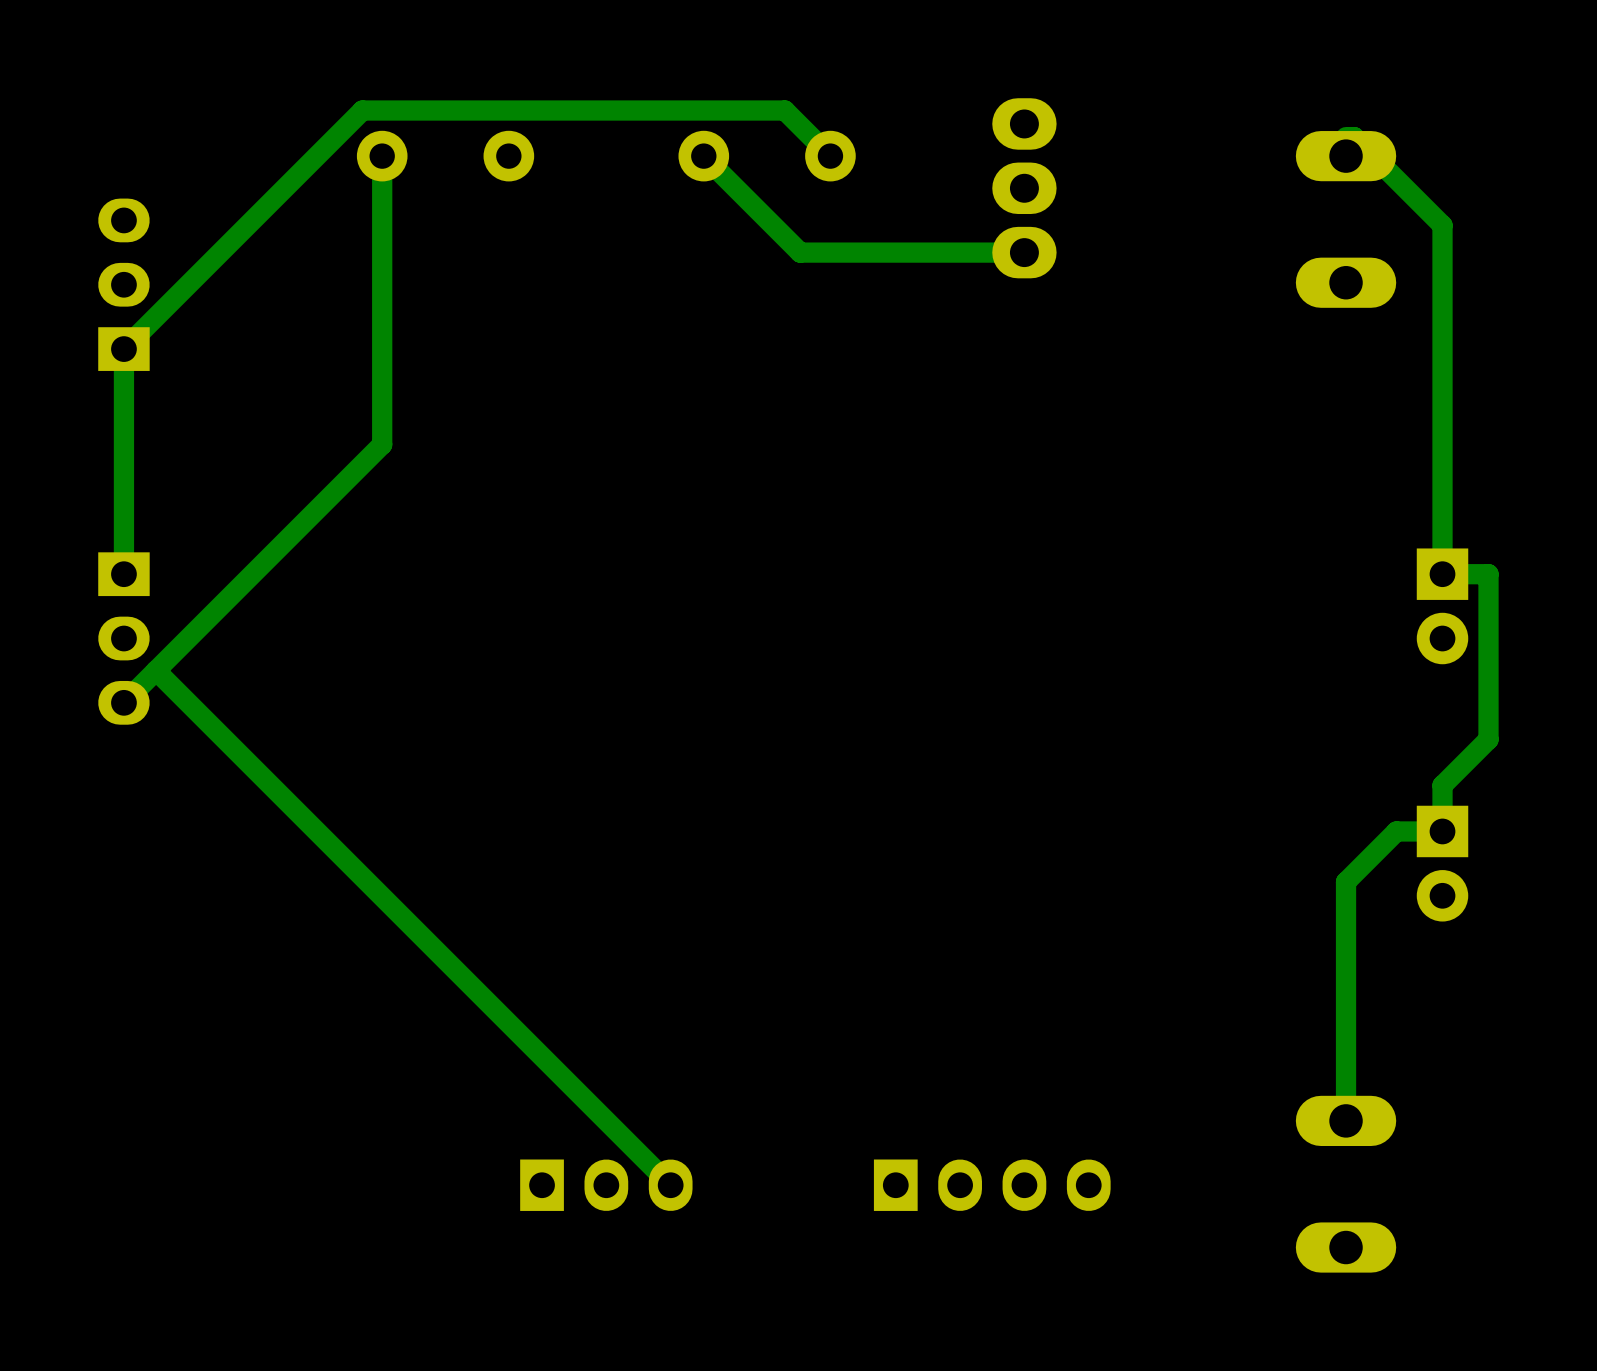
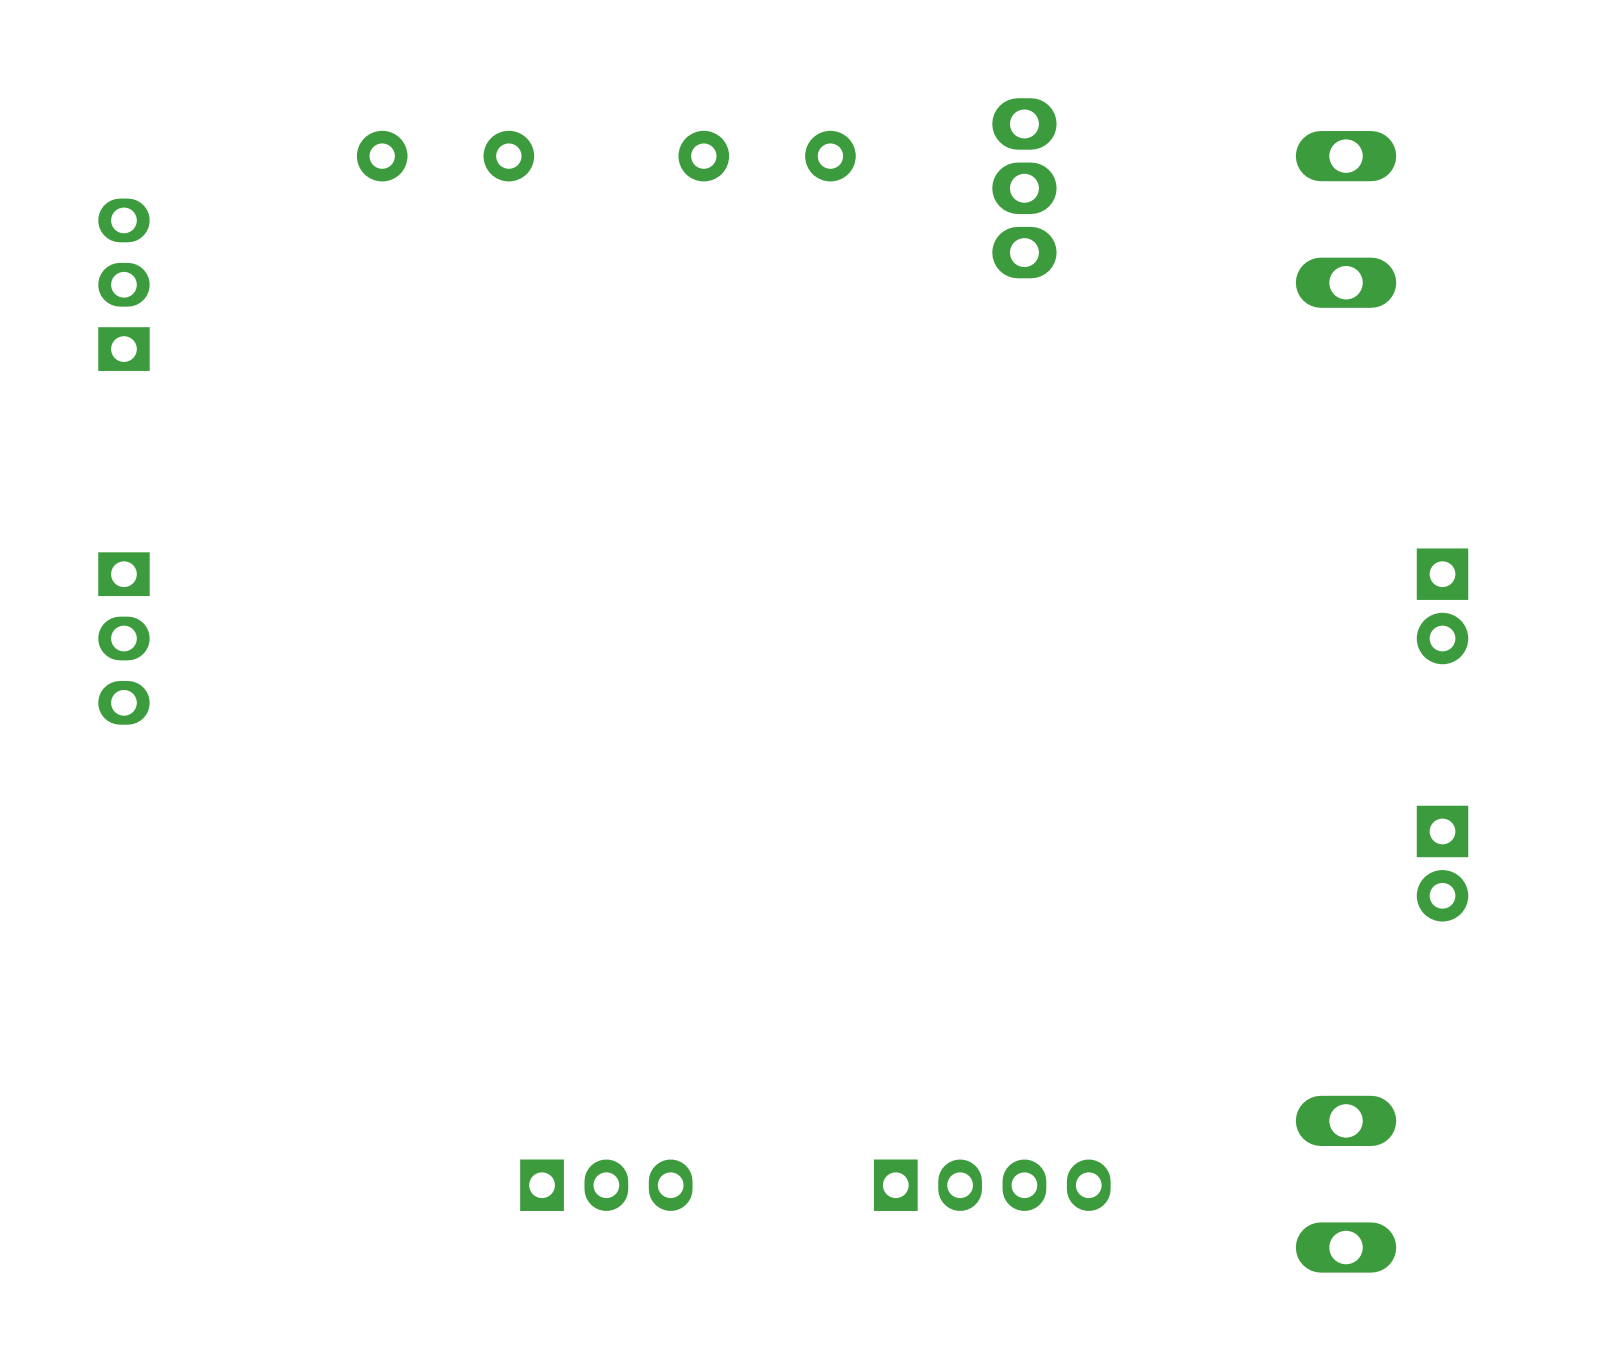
track: (1346, 137) (1354, 137) (1442, 225) (1442, 574) (1488, 574) (1488, 739) (1442, 785) (1442, 831) (1396, 831) (1346, 881) (1346, 1120) -> none
track: (382, 156) (382, 444) (123, 702) -> none
track: (703, 156) (800, 252) (1024, 252) -> none
track: (830, 156) (784, 110) (362, 110) (123, 349) (123, 574) -> none
track: (156, 670) (670, 1185) -> none

